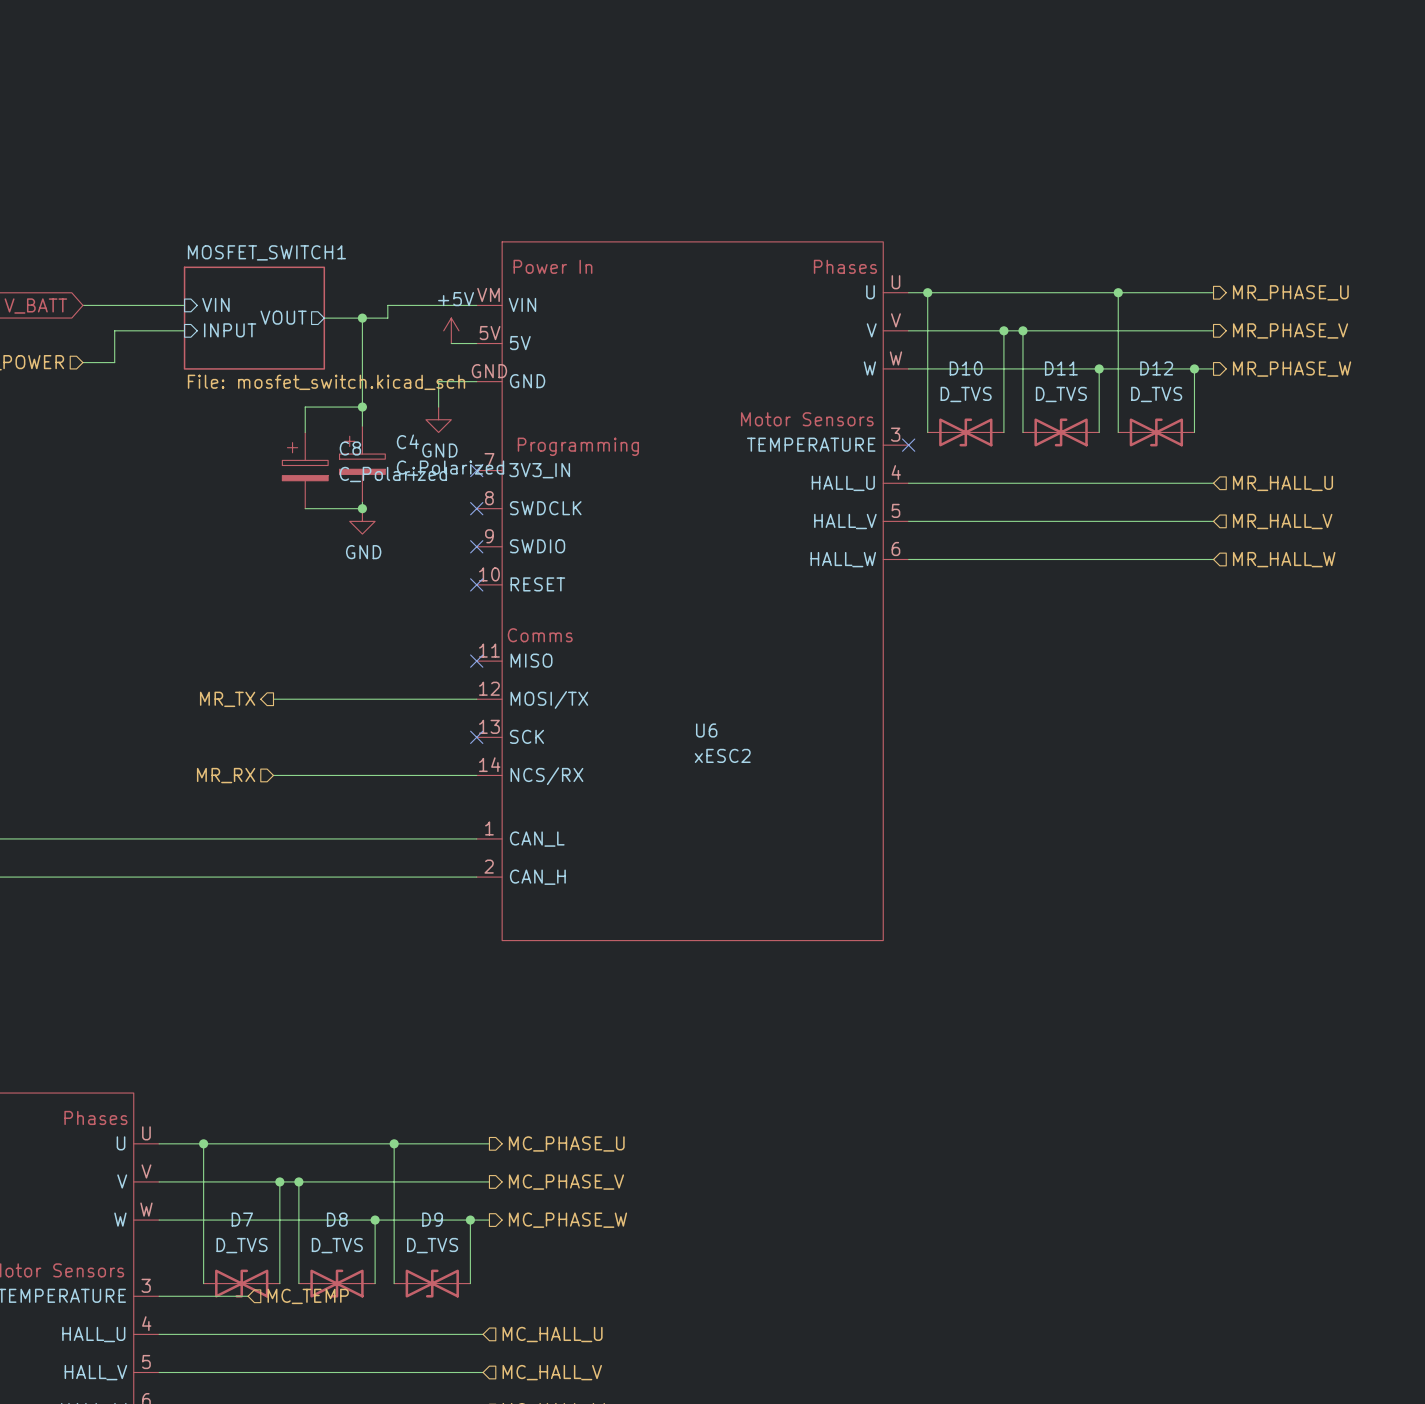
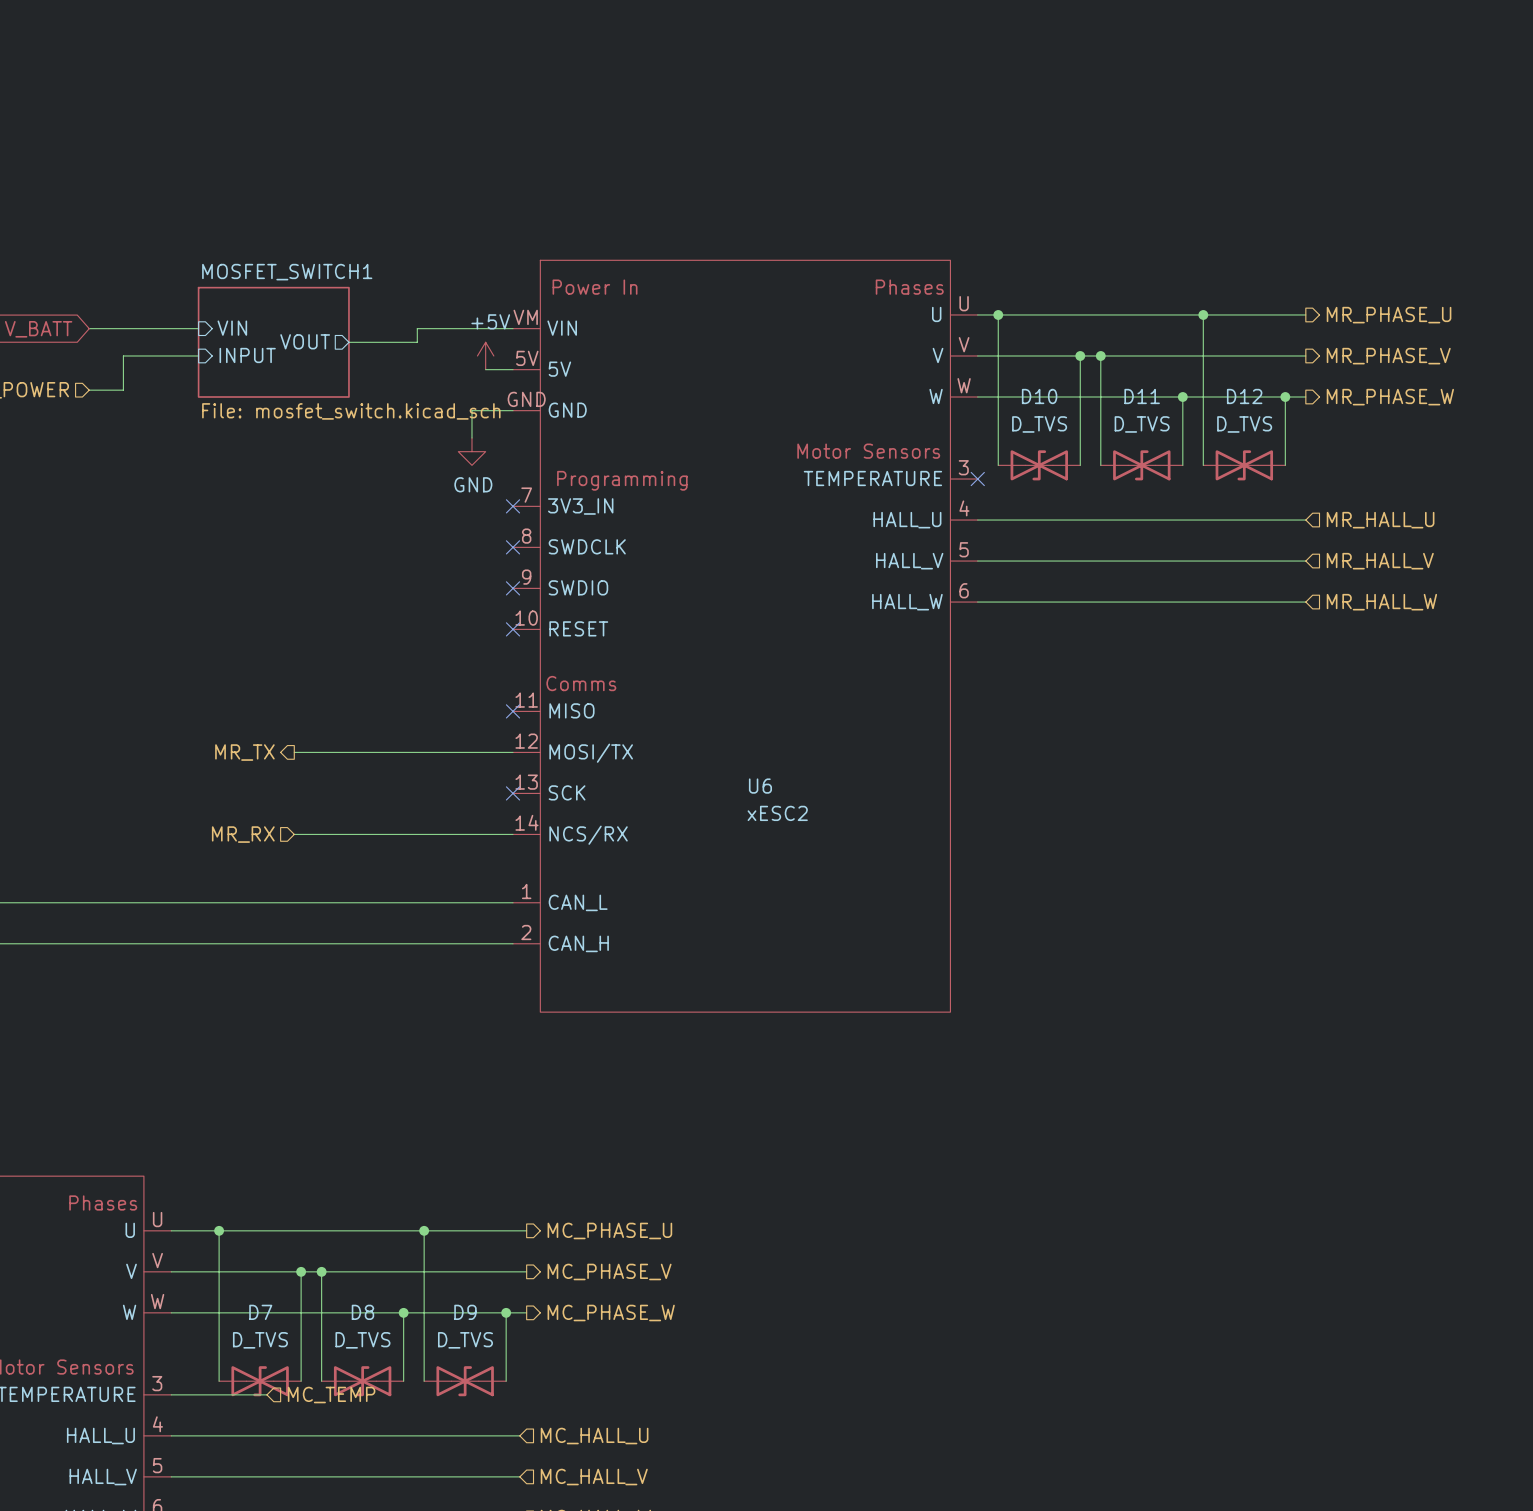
wire: (362, 318) (362, 426) -> none
junction: (362, 318) -> none
wire: (362, 407) (305, 407) (305, 432) -> none
junction: (362, 407) -> none
C4: C_Polarized (362, 464) -> none
C8: C_Polarized (305, 470) -> none
wire: (362, 502) (362, 508) (305, 508) -> none
junction: (362, 508) -> none
power symbol: GND (362, 521) -> none

